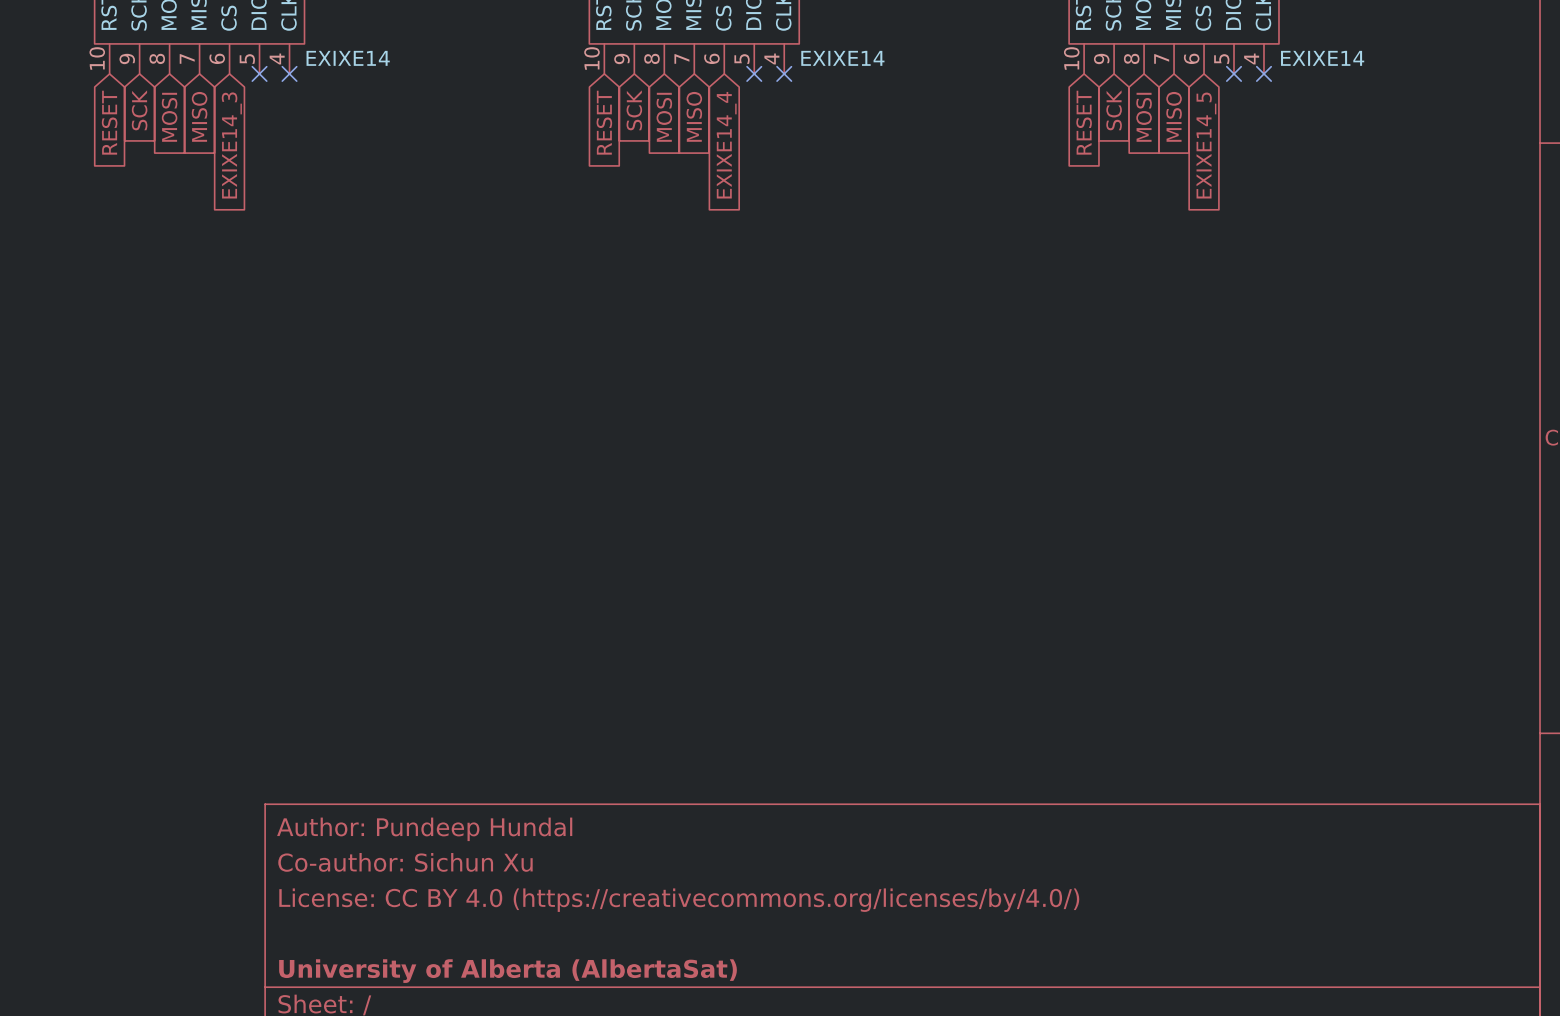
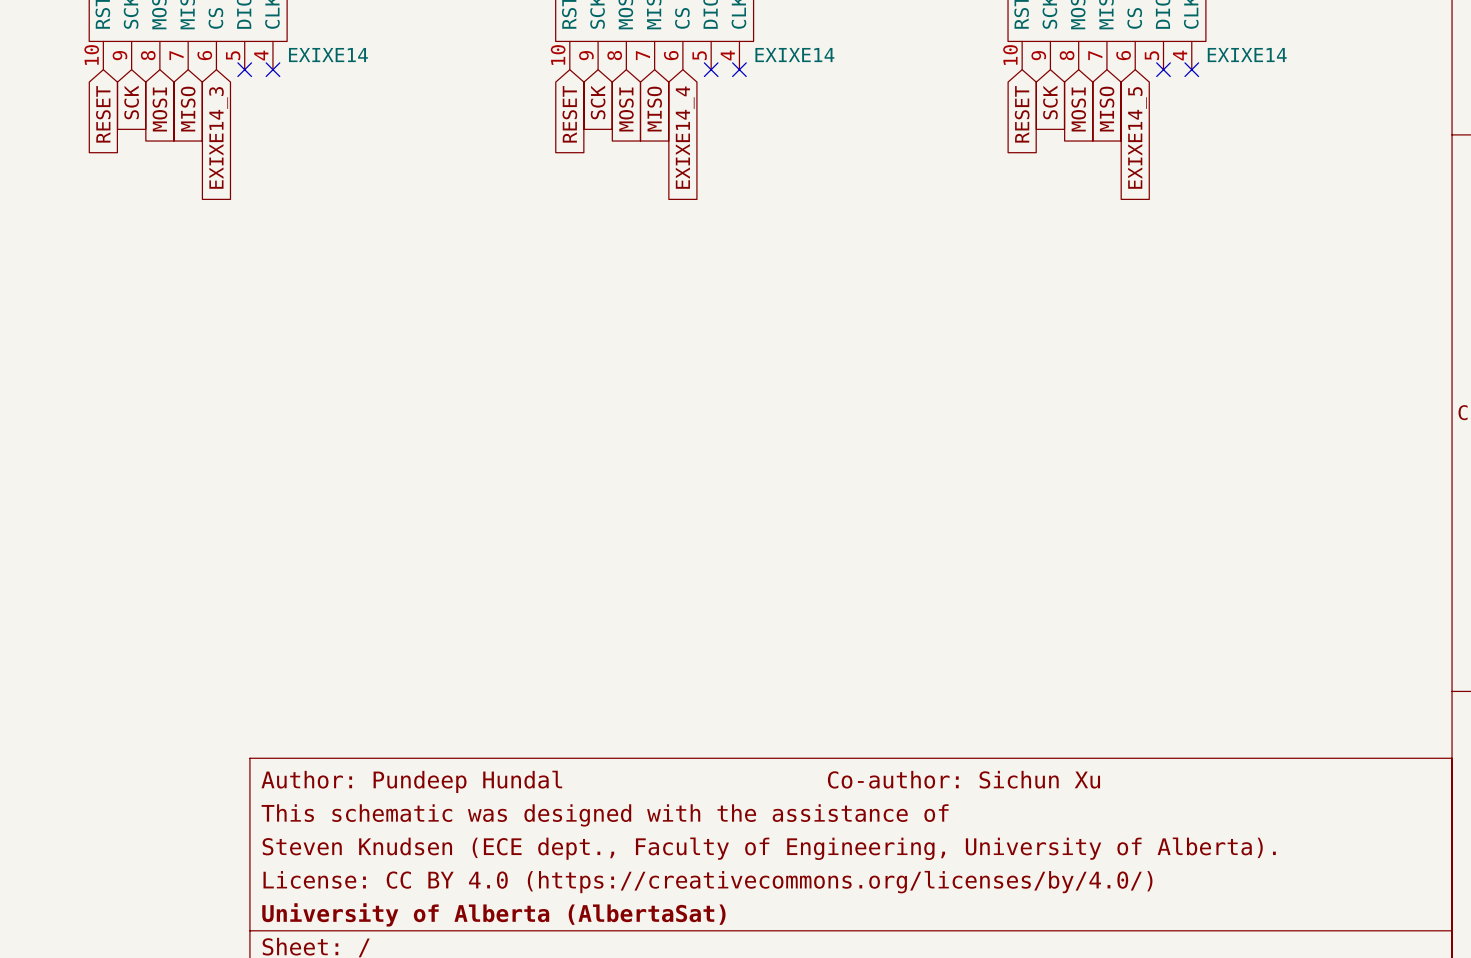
title block: Author: Pundeep Hundal (424, 829) -> Author: Pundeep Hundal Co-author: Sichun Xu (680, 781)
title block: Co-author: Sichun Xu (405, 862) -> This schematic was designed with the assistance of (605, 815)
title block: License: CC BY 4.0 (https://creativecommons.org/licenses/by/4.0/) (679, 900) -> Steven Knudsen (ECE dept., Faculty of Engineering, University of Alberta). (769, 848)
title block: none -> License: CC BY 4.0 (https://creativecommons.org/licenses/by/4.0/) (707, 882)

